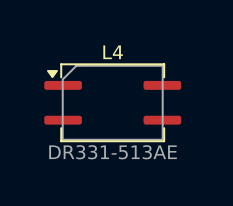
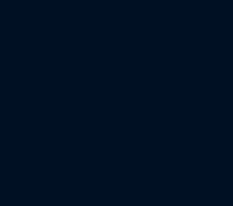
L4: DR331-513AE (112, 102) -> none

